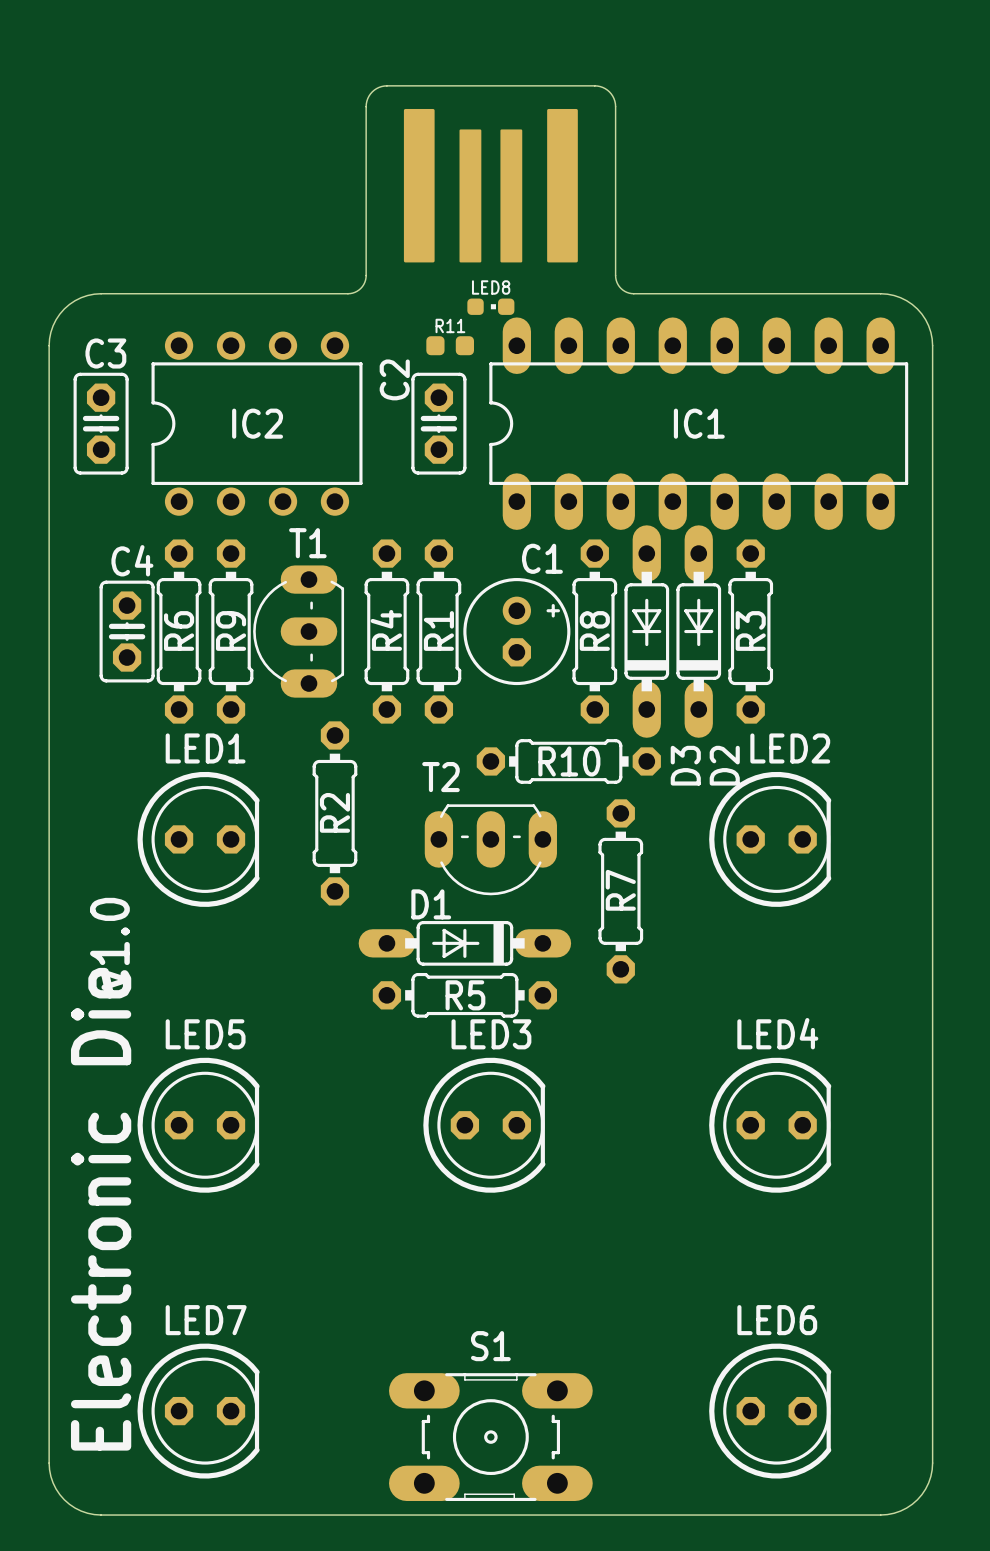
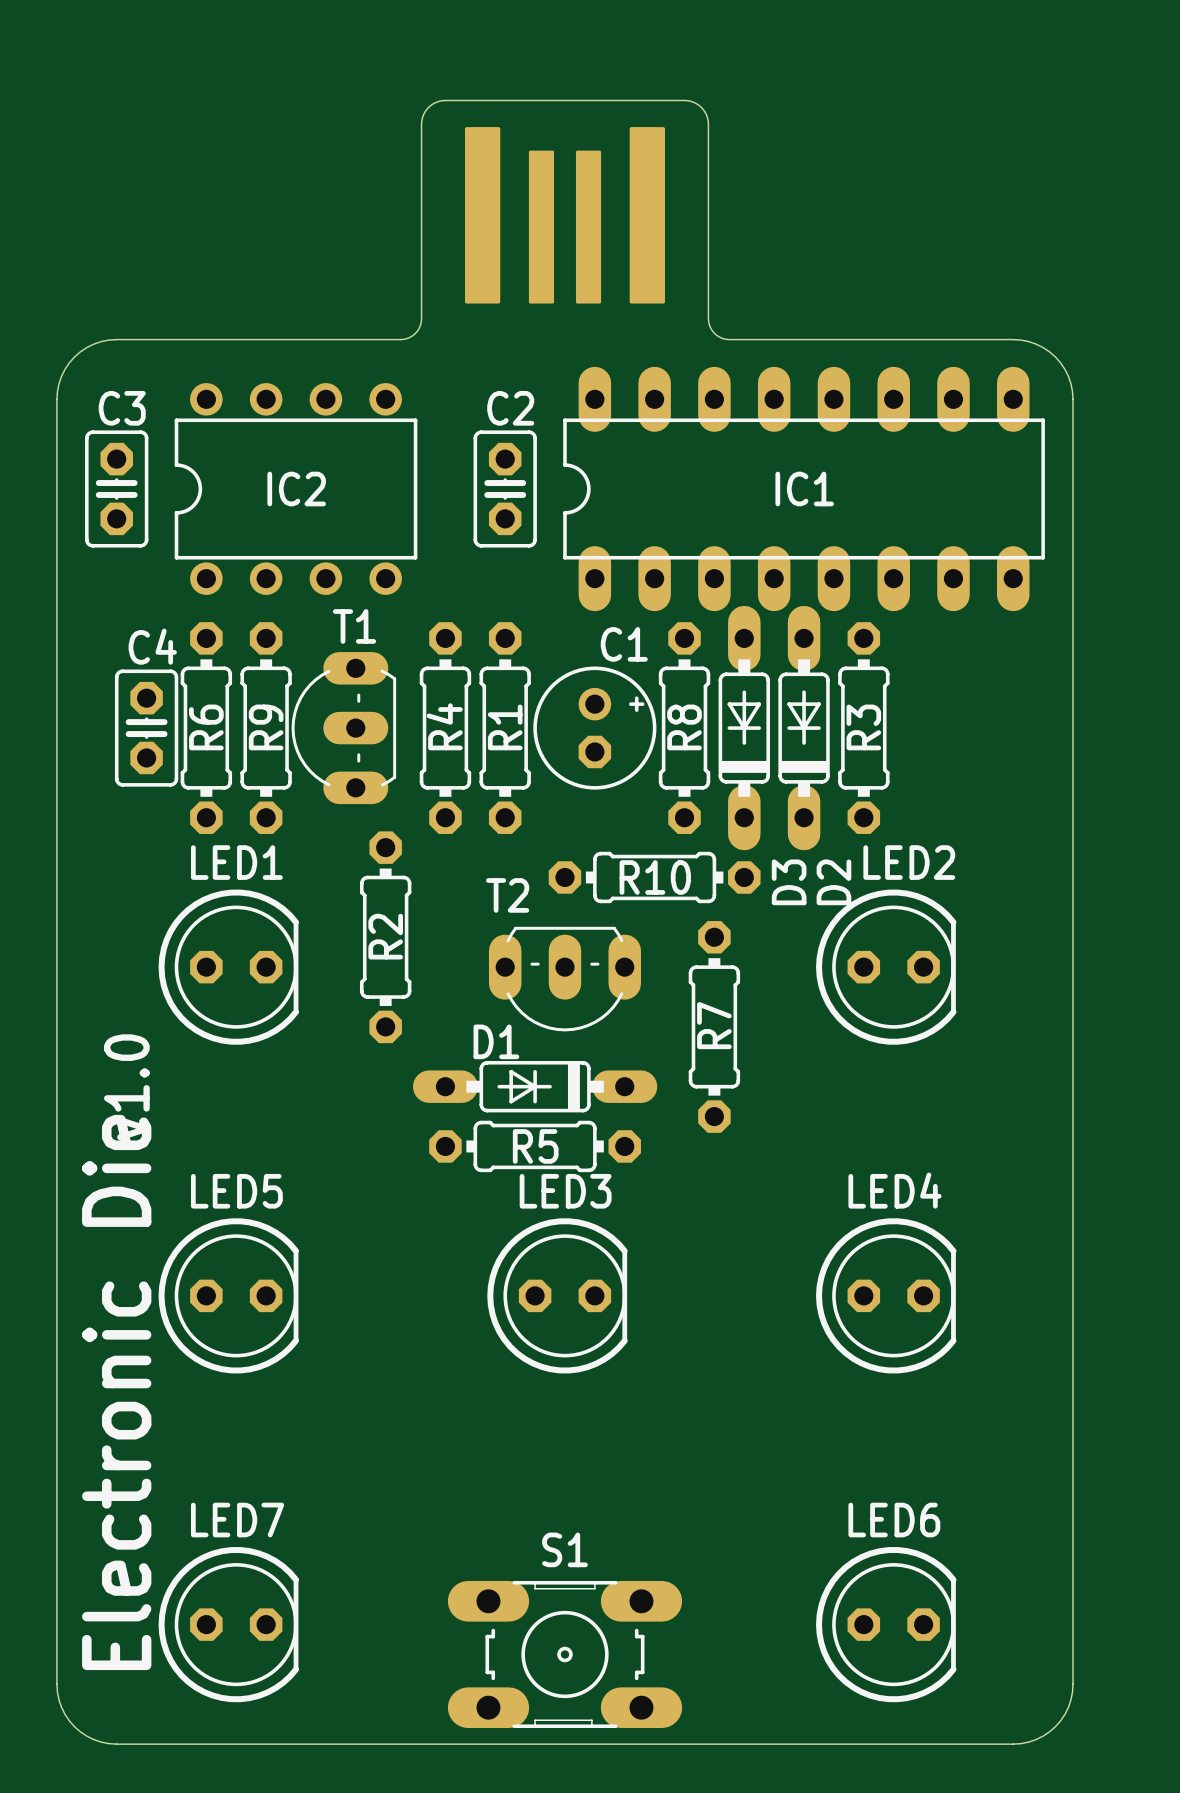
LED8: (490, 306) -> none
R11: (450, 345) -> none
C2 name rotation: 0° (394, 379) -> 90° clockwise (510, 408)

